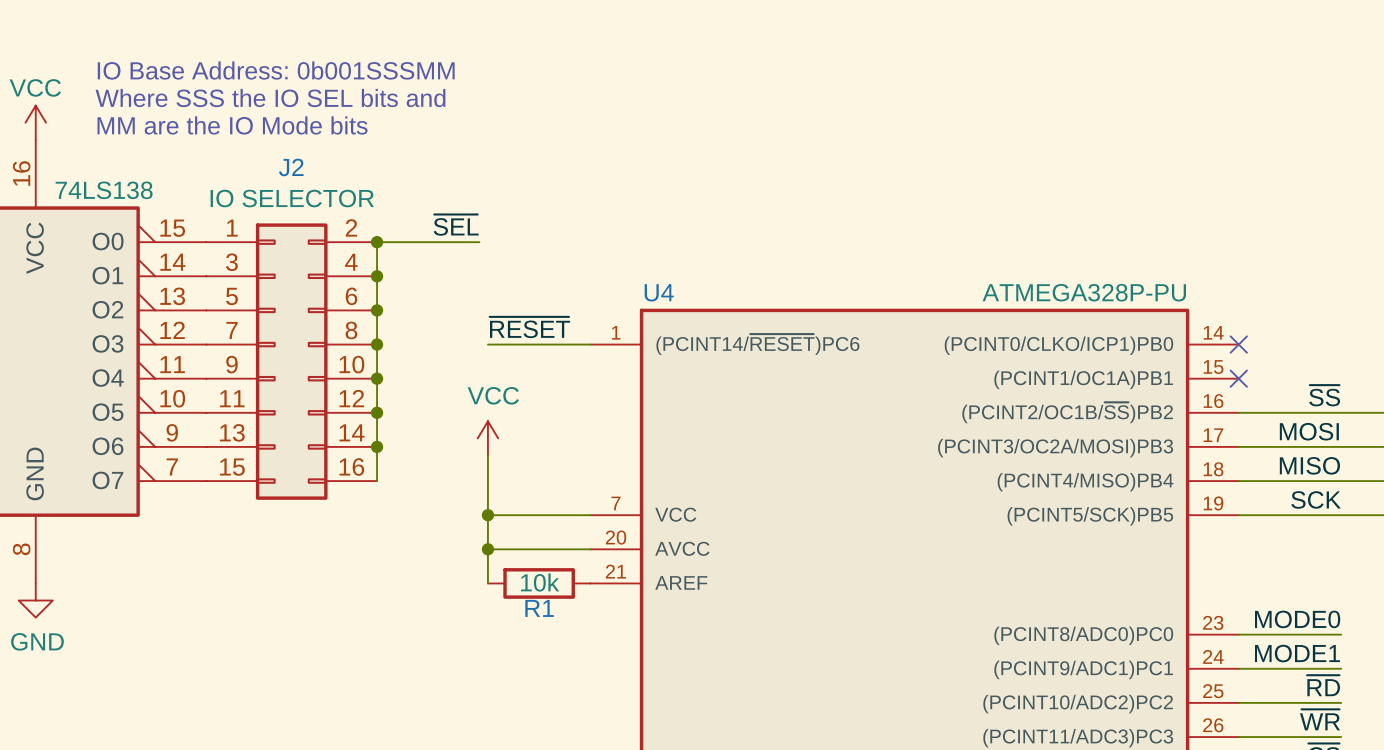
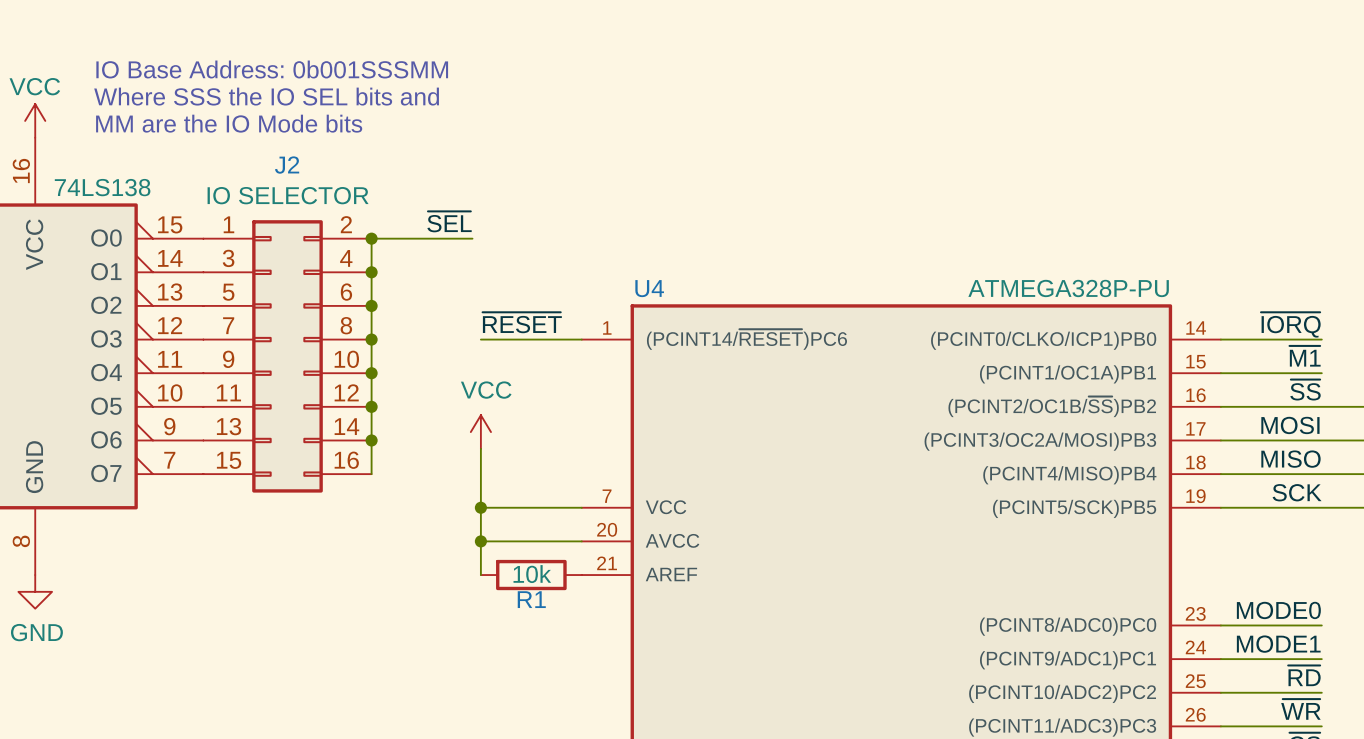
label: none -> ~{IORQ} (1290, 324)
wire: none -> (1220, 339) (1321, 339)
no-connect mark: (1238, 344) -> none
label: none -> ~{M1} (1305, 356)
wire: none -> (1220, 373) (1321, 373)
no-connect mark: (1238, 378) -> none

